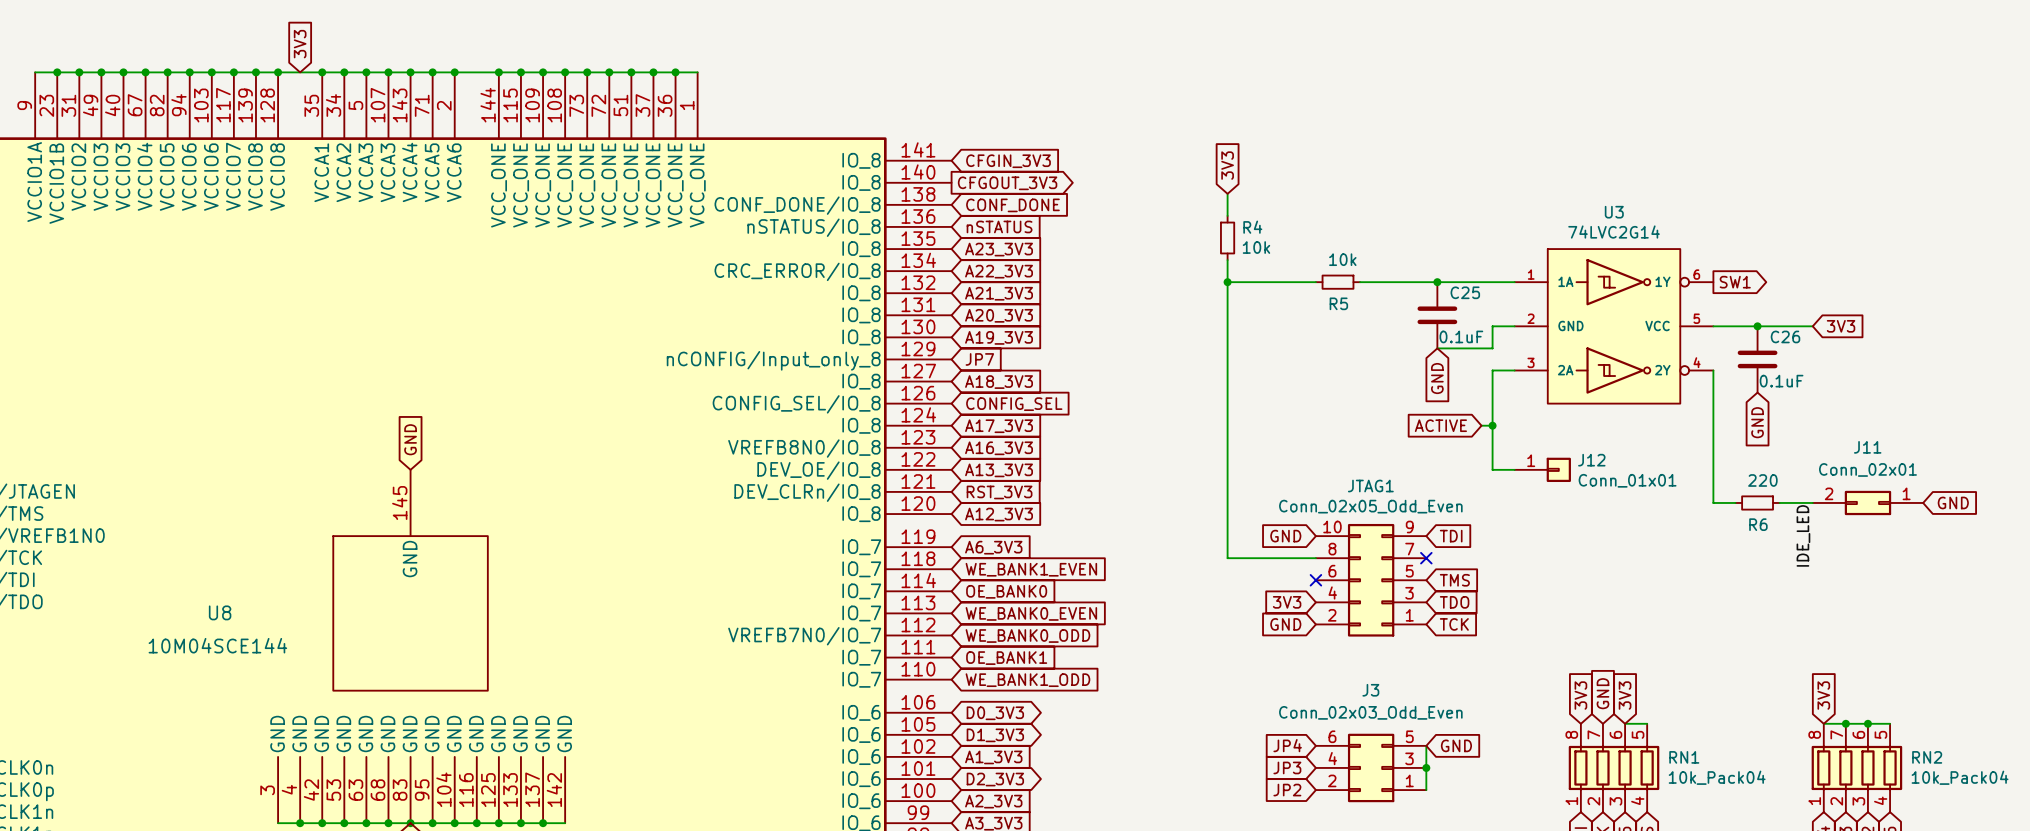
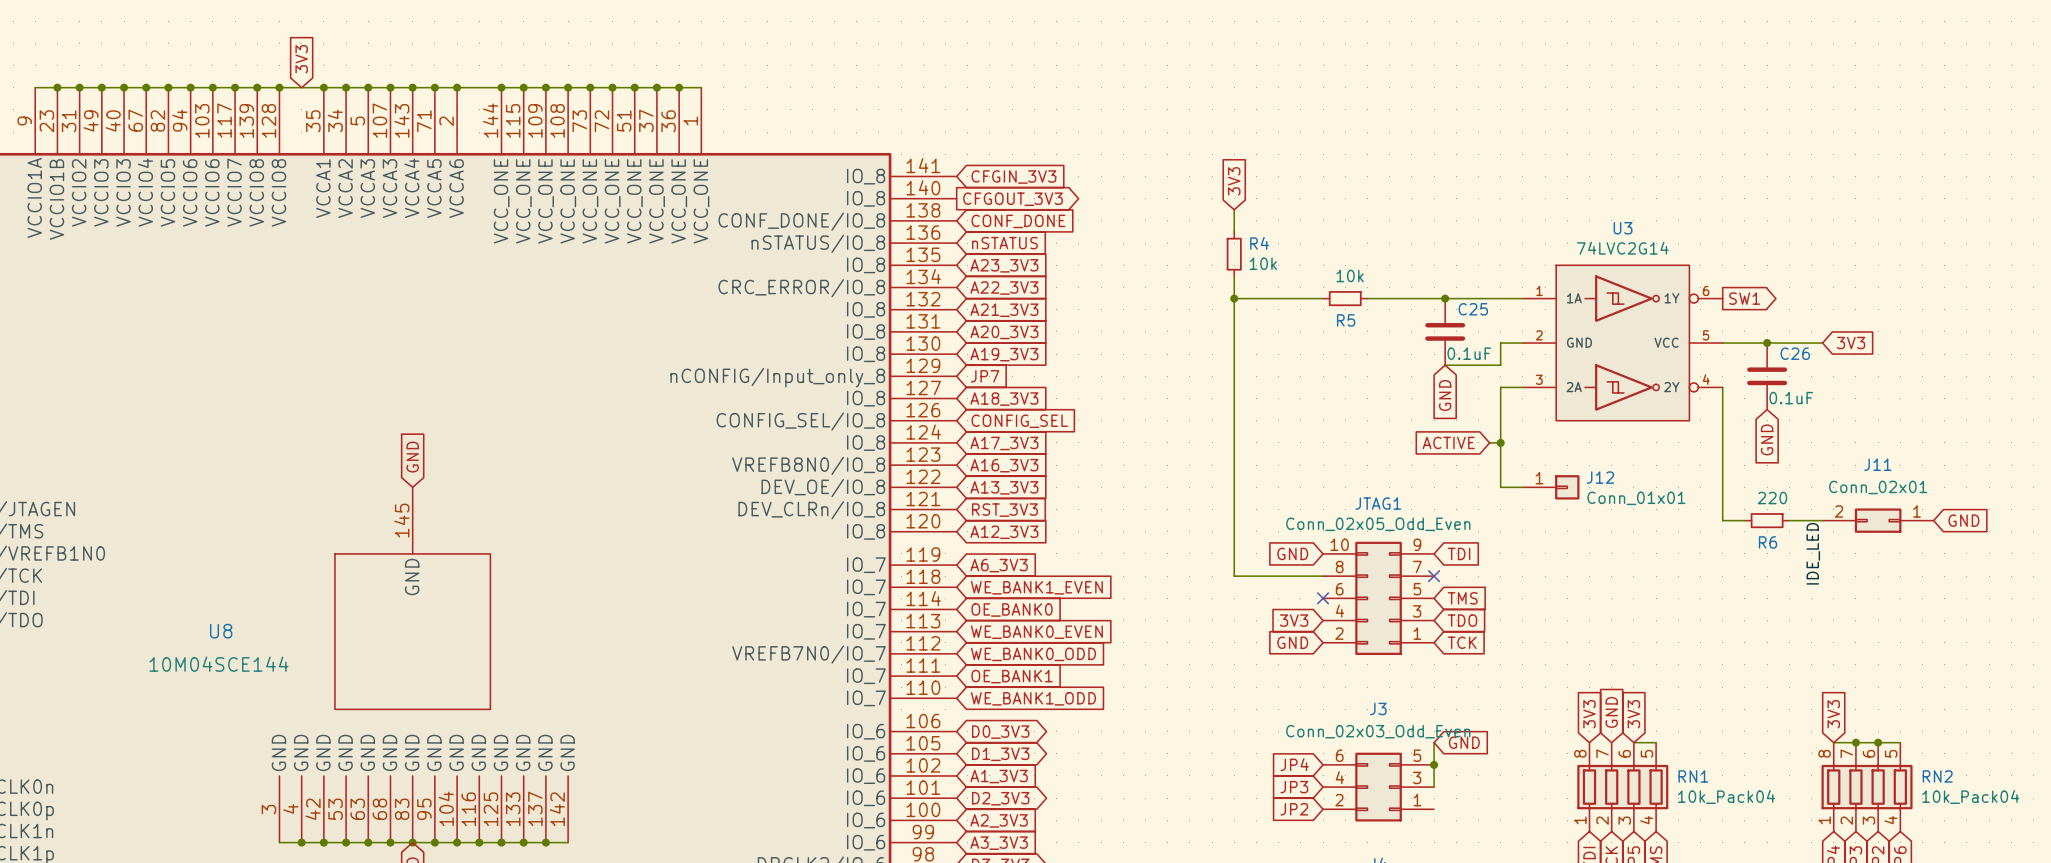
global label position: GND (1456, 745) -> GND (1464, 742)
wire: (1426, 767) (1426, 790) -> (1434, 742) (1434, 764)
junction position: (1426, 767) -> (1434, 764)

